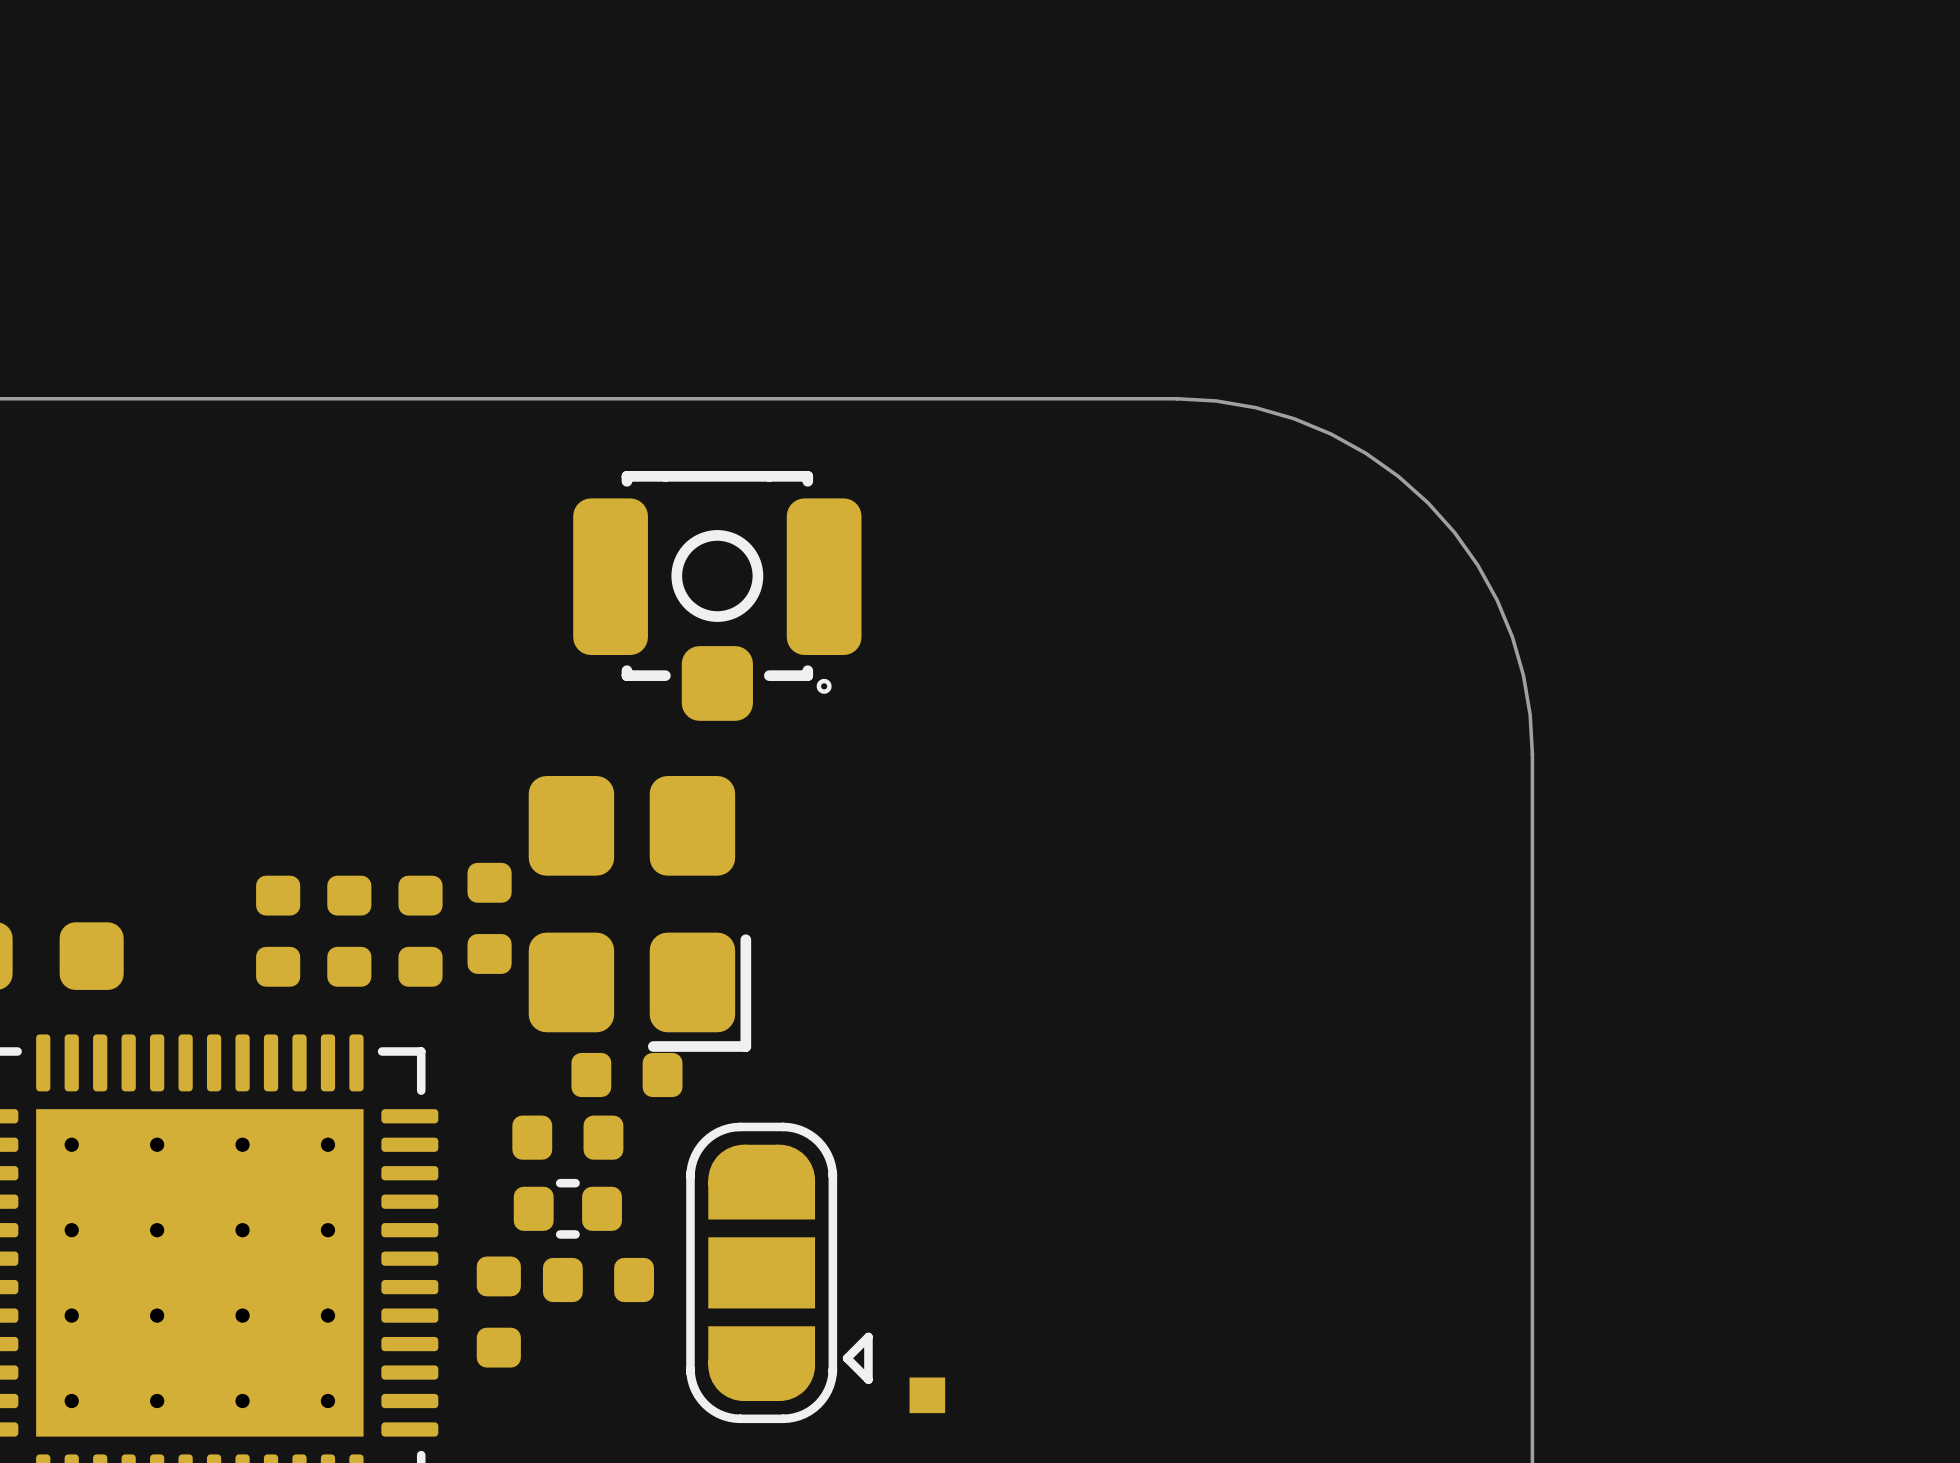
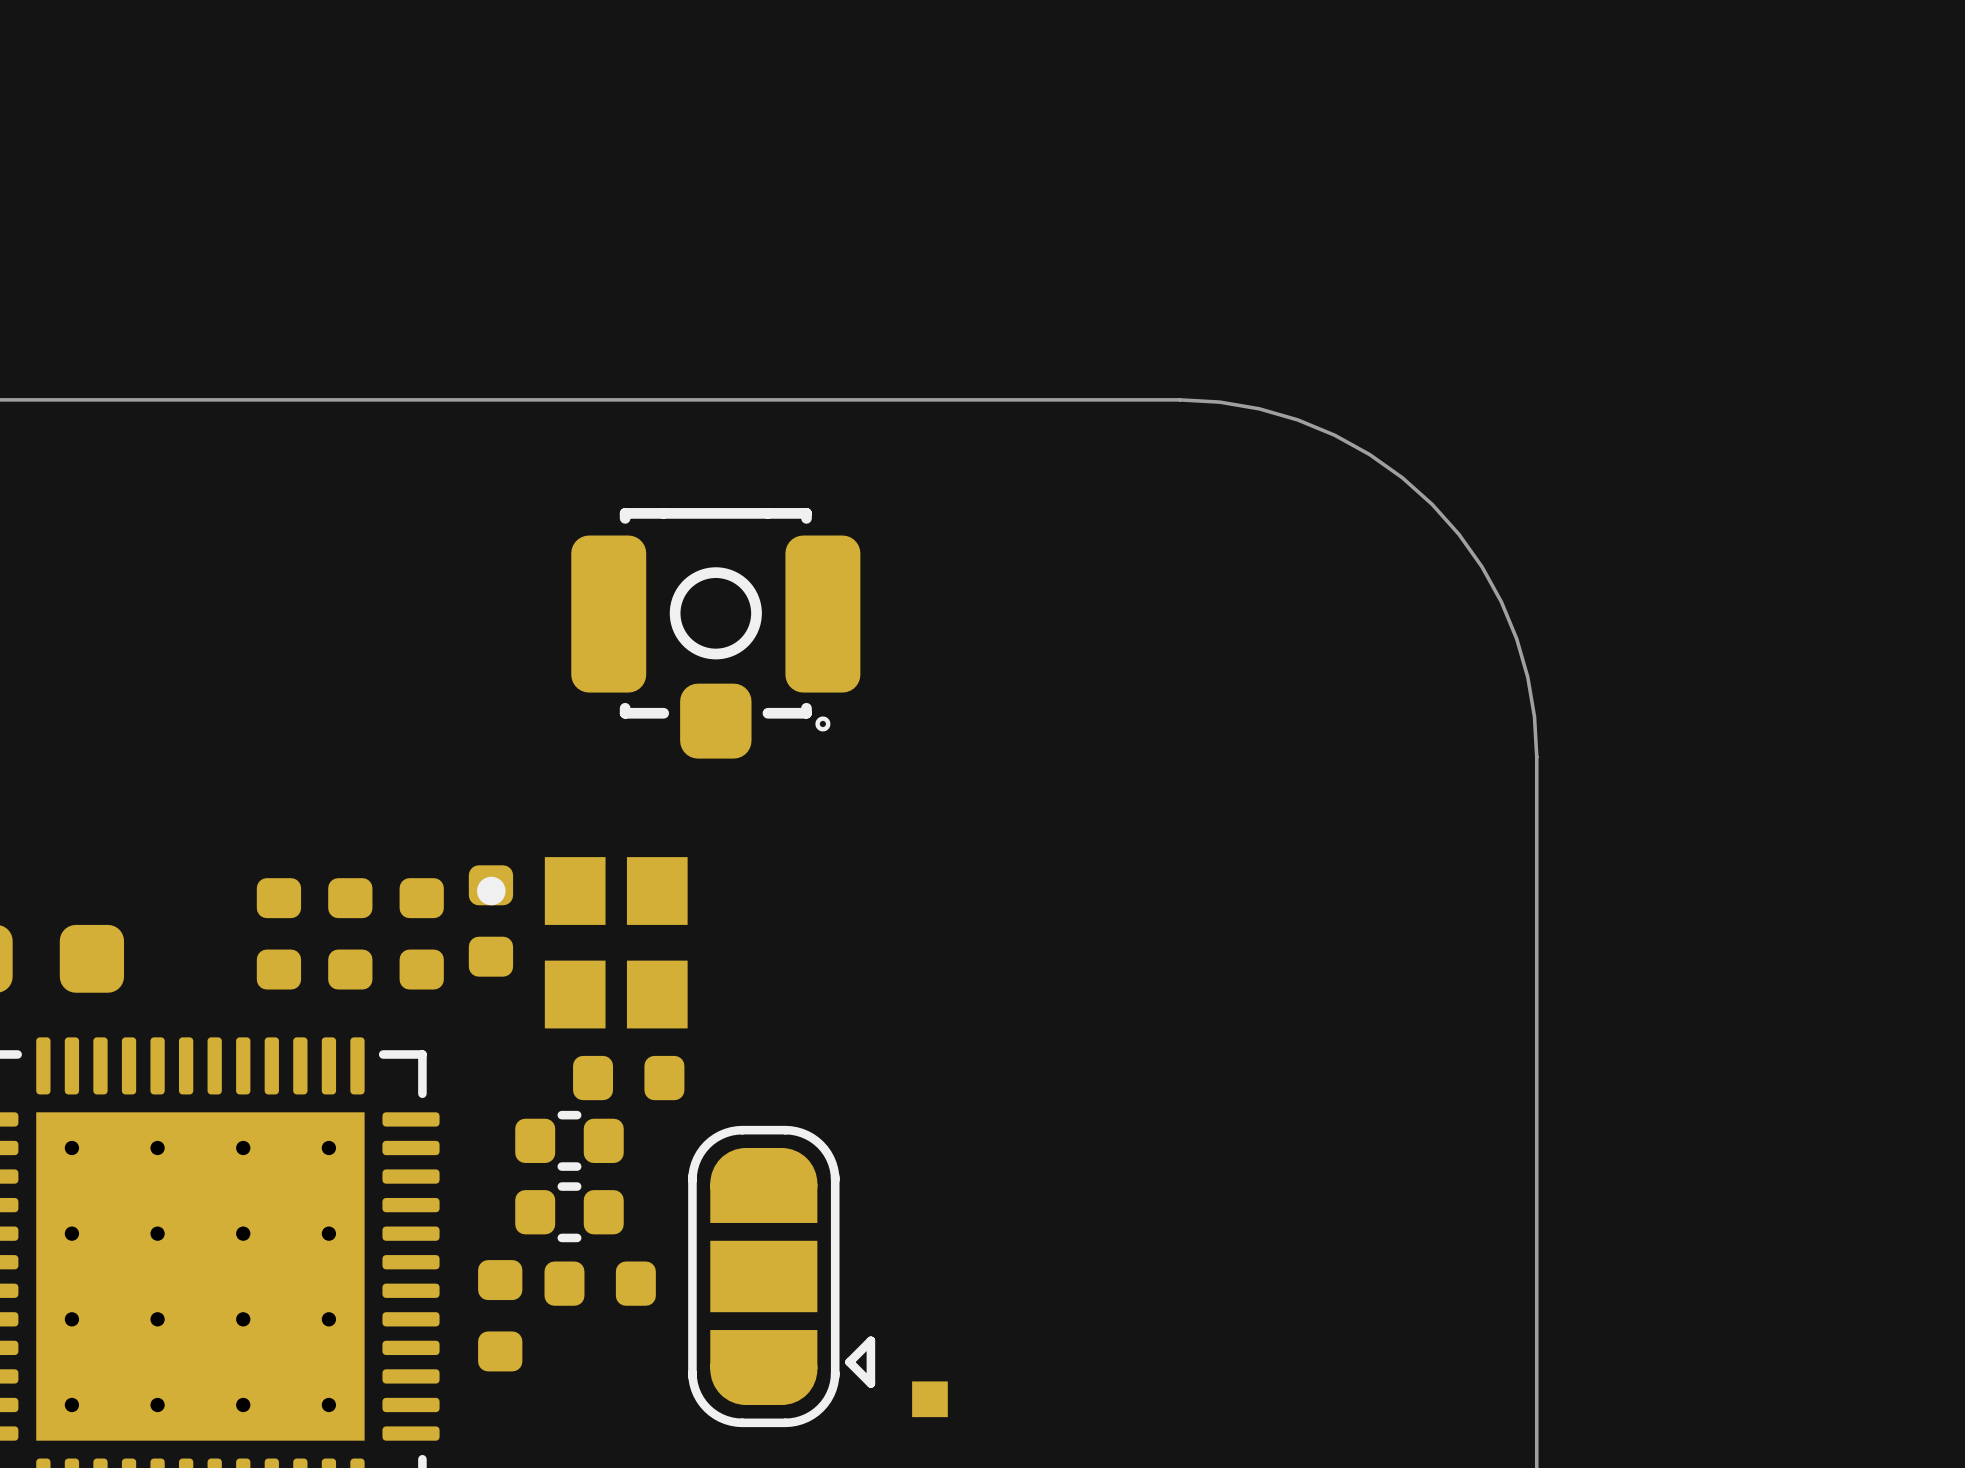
part position: (717, 595) -> (715, 633)
part footprint: [528, 776, 752, 1052] -> [477, 857, 688, 1029]
part footprint: [512, 1115, 624, 1160] -> [515, 1110, 624, 1171]

